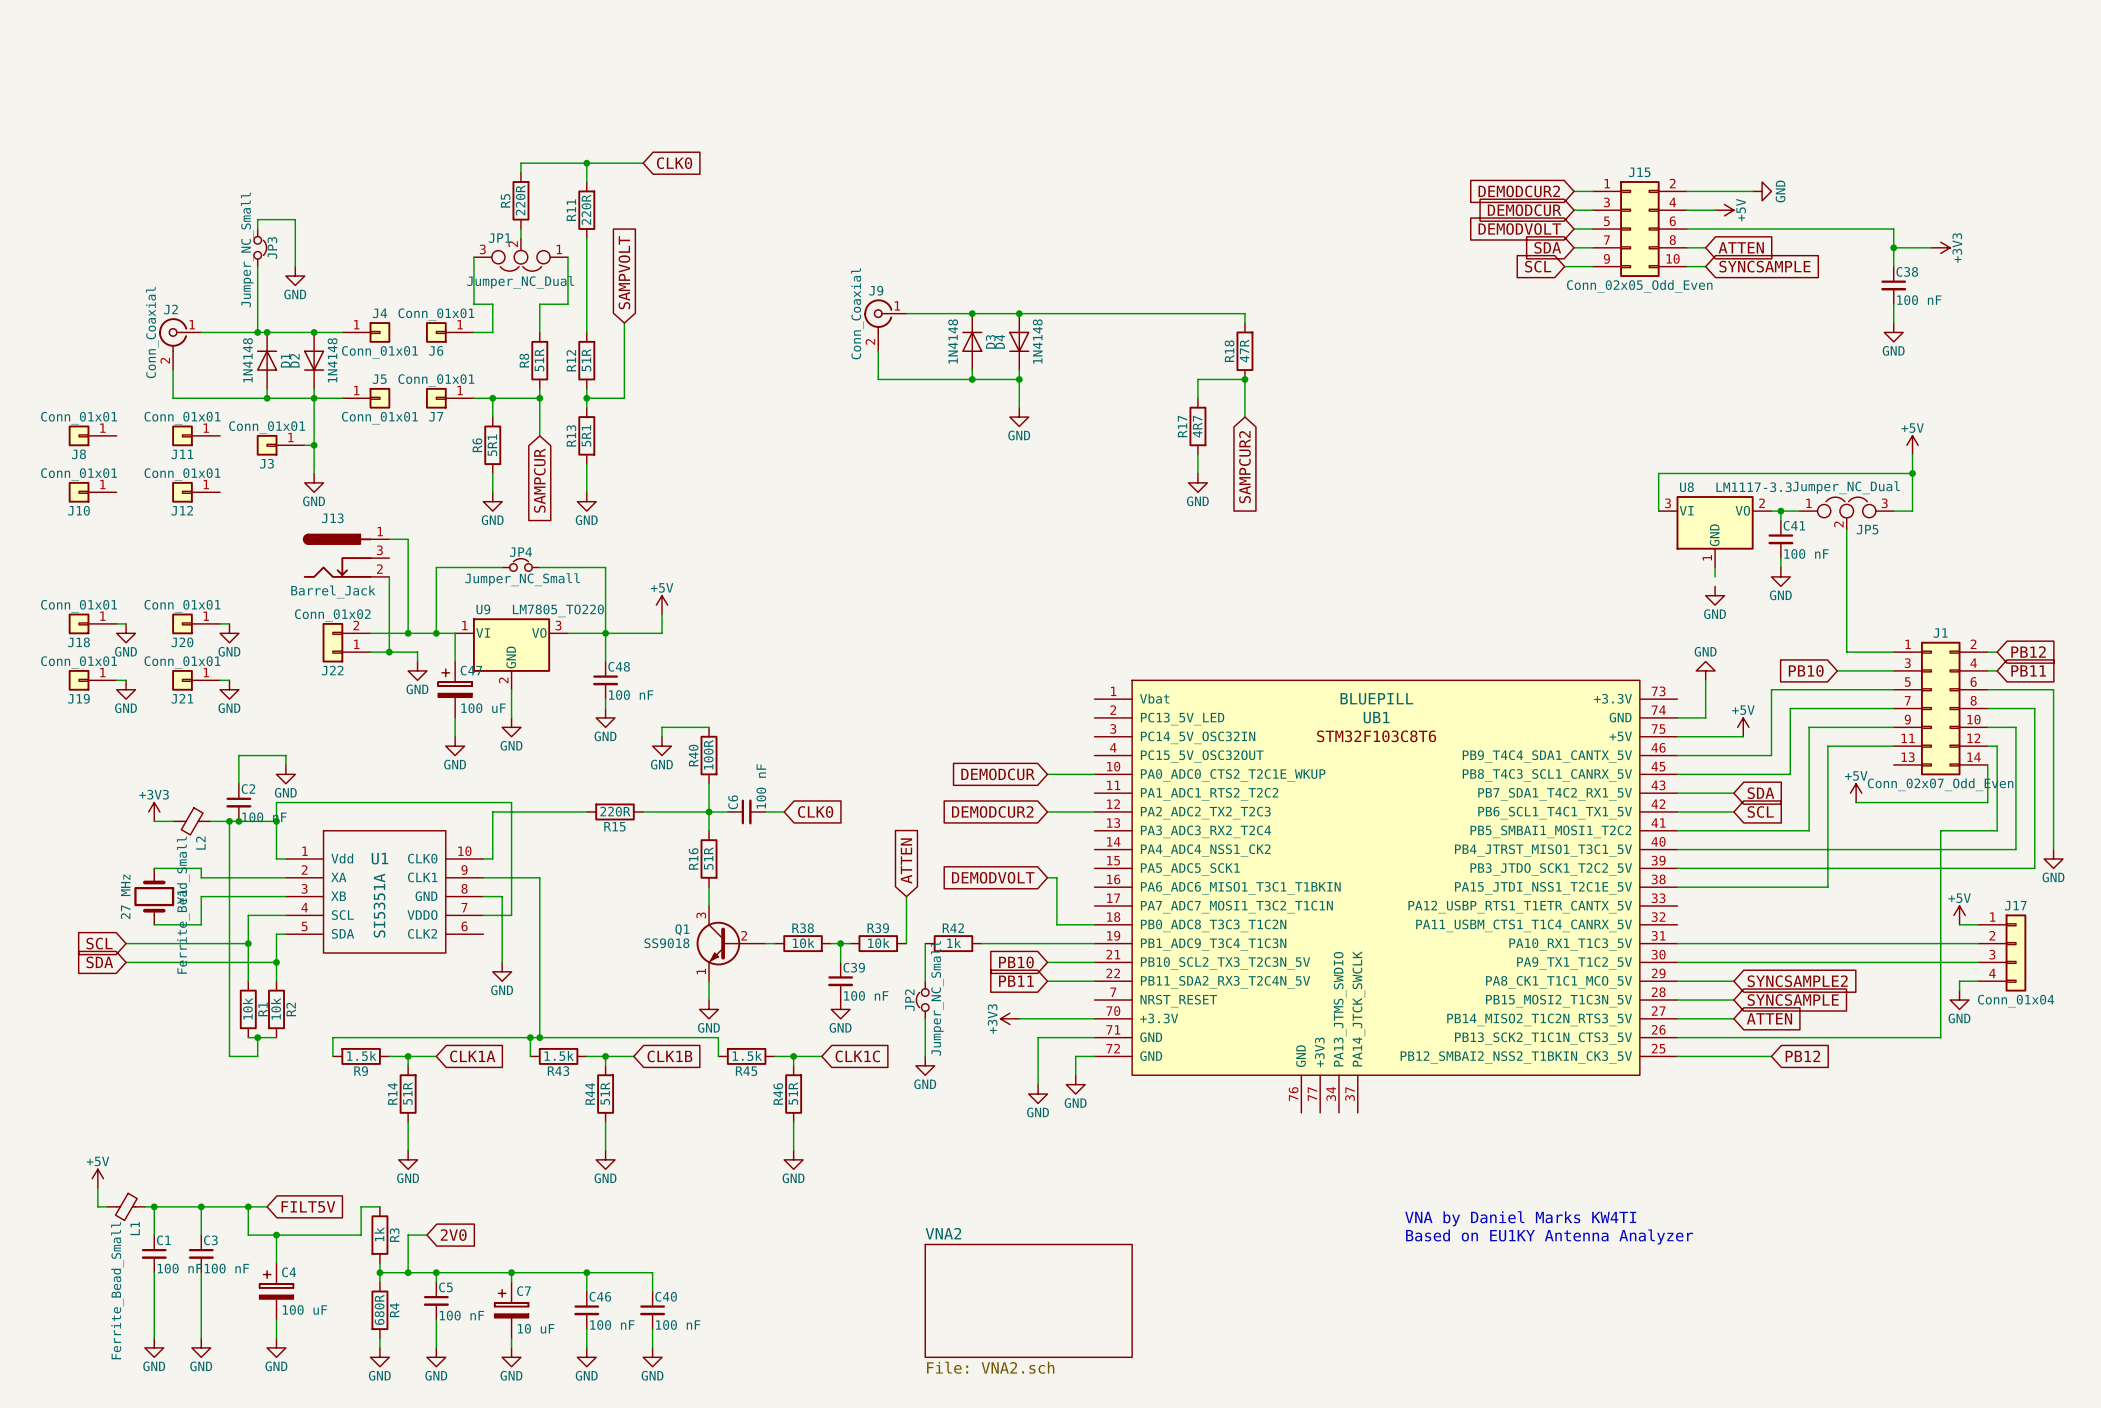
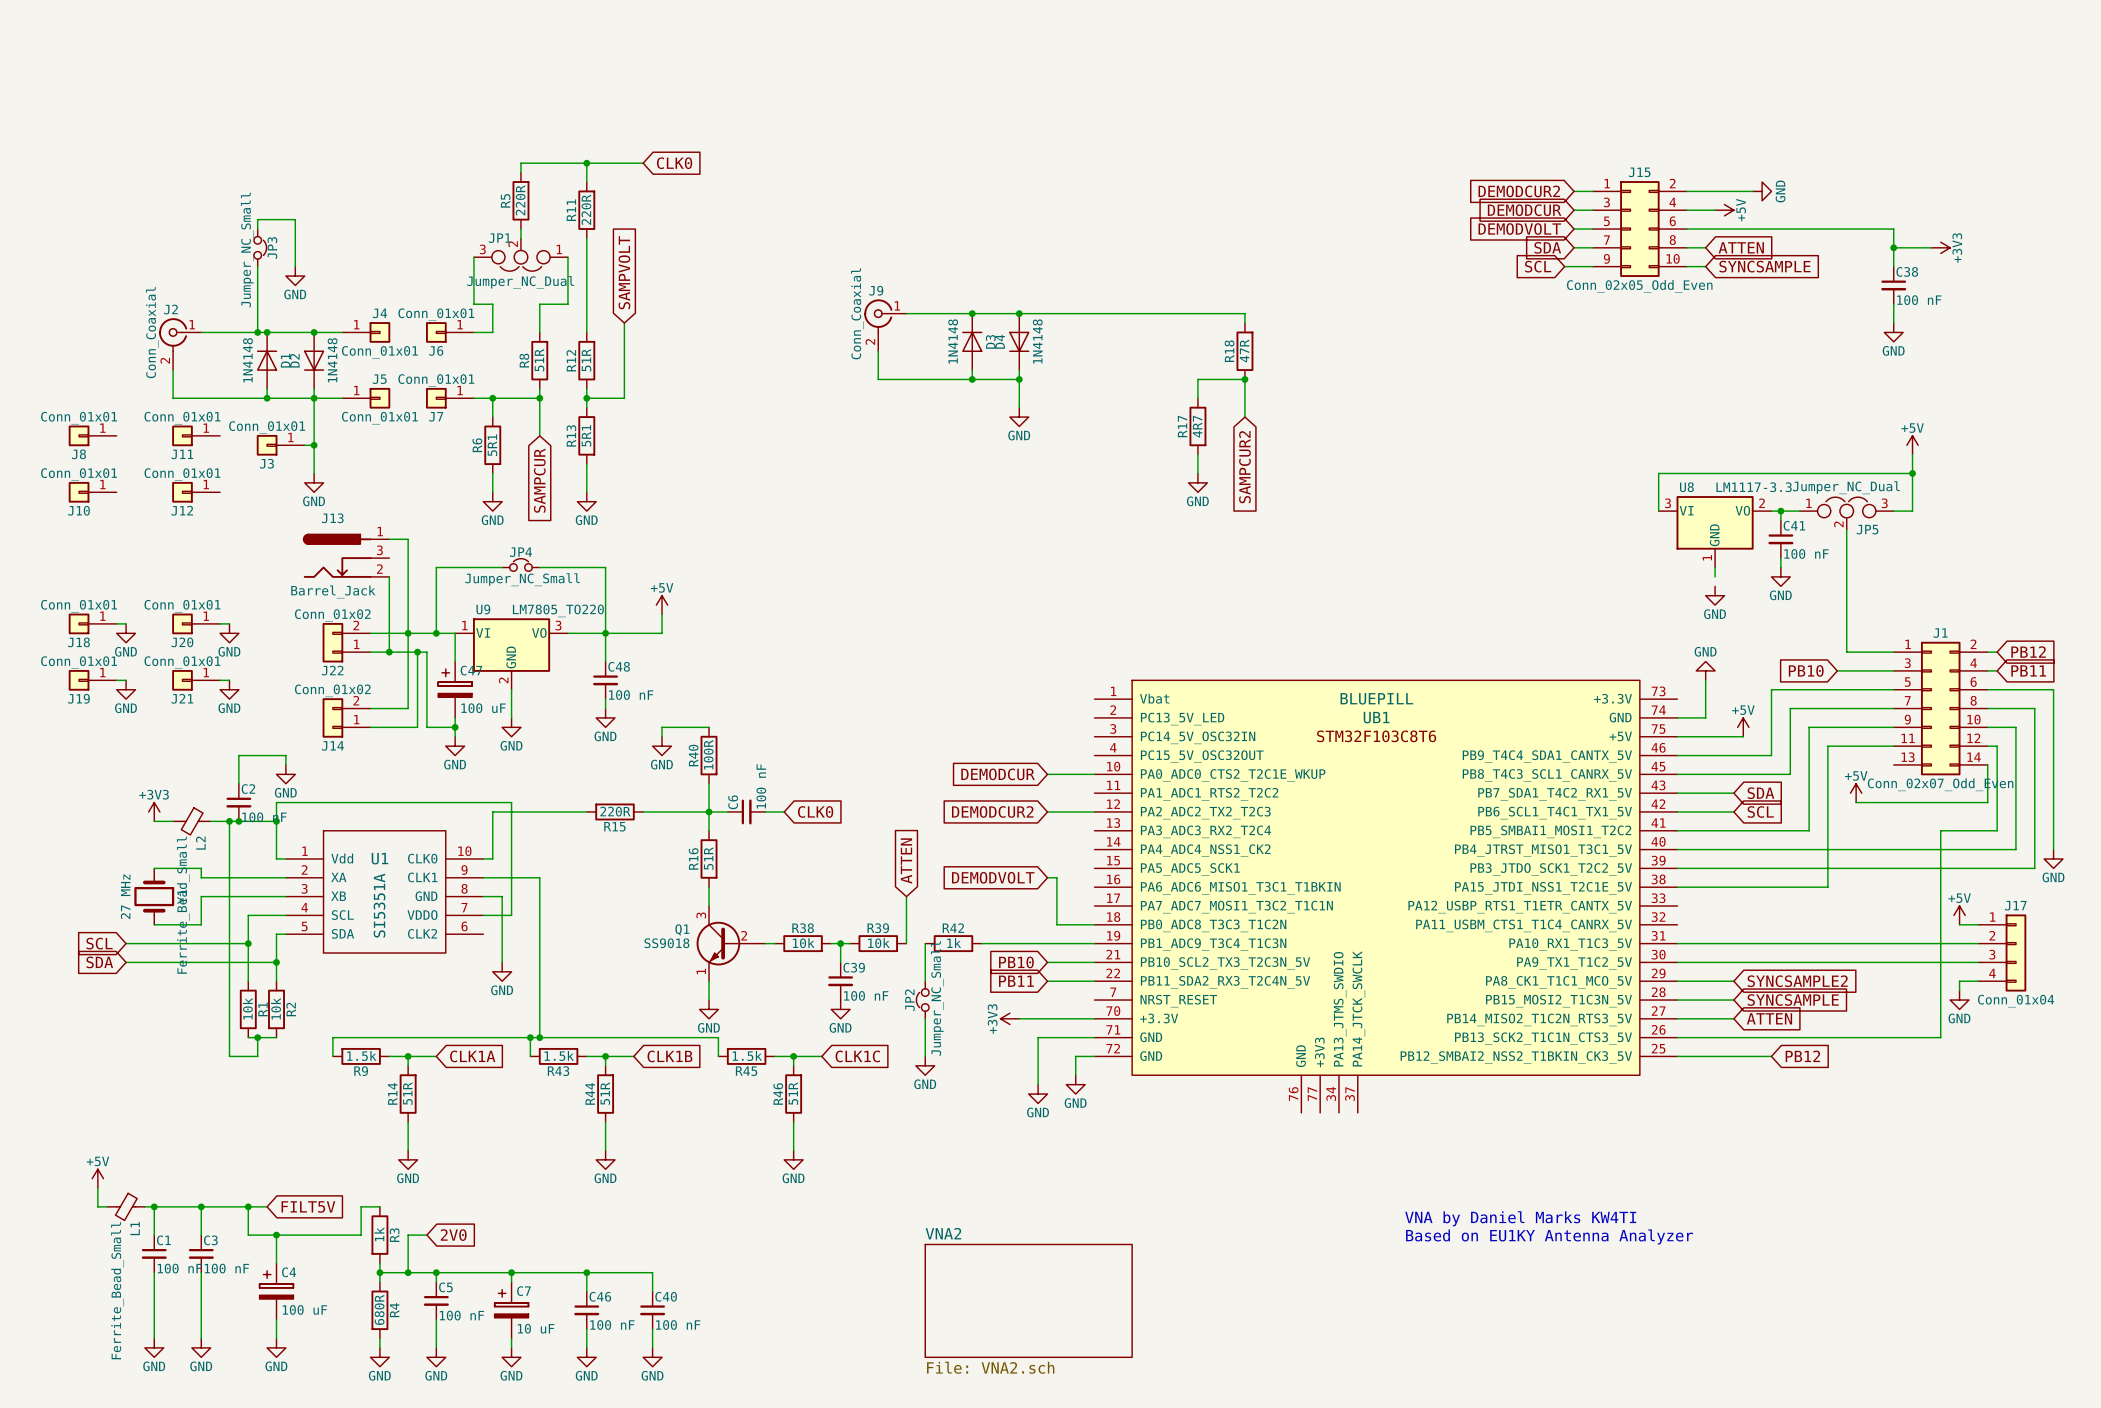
wire: none -> (408, 633) (408, 708) (370, 708)
wire: none -> (417, 652) (426, 652) (426, 727) (455, 727)
junction: none -> (417, 652)
wire: none -> (417, 661) (417, 727) (370, 727)
power symbol: GND (417, 670) -> none
J14: none -> Conn_01x02 (346, 717)
junction: none -> (455, 727)

